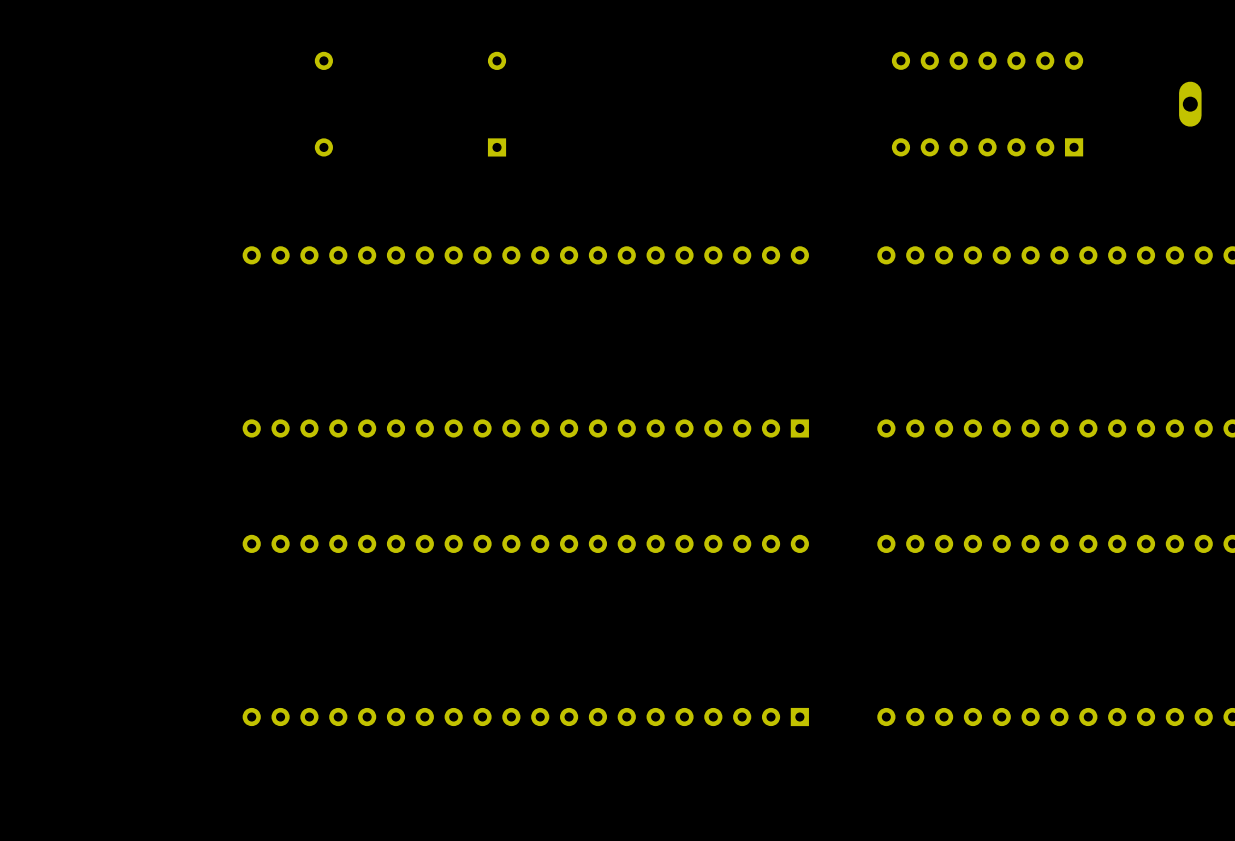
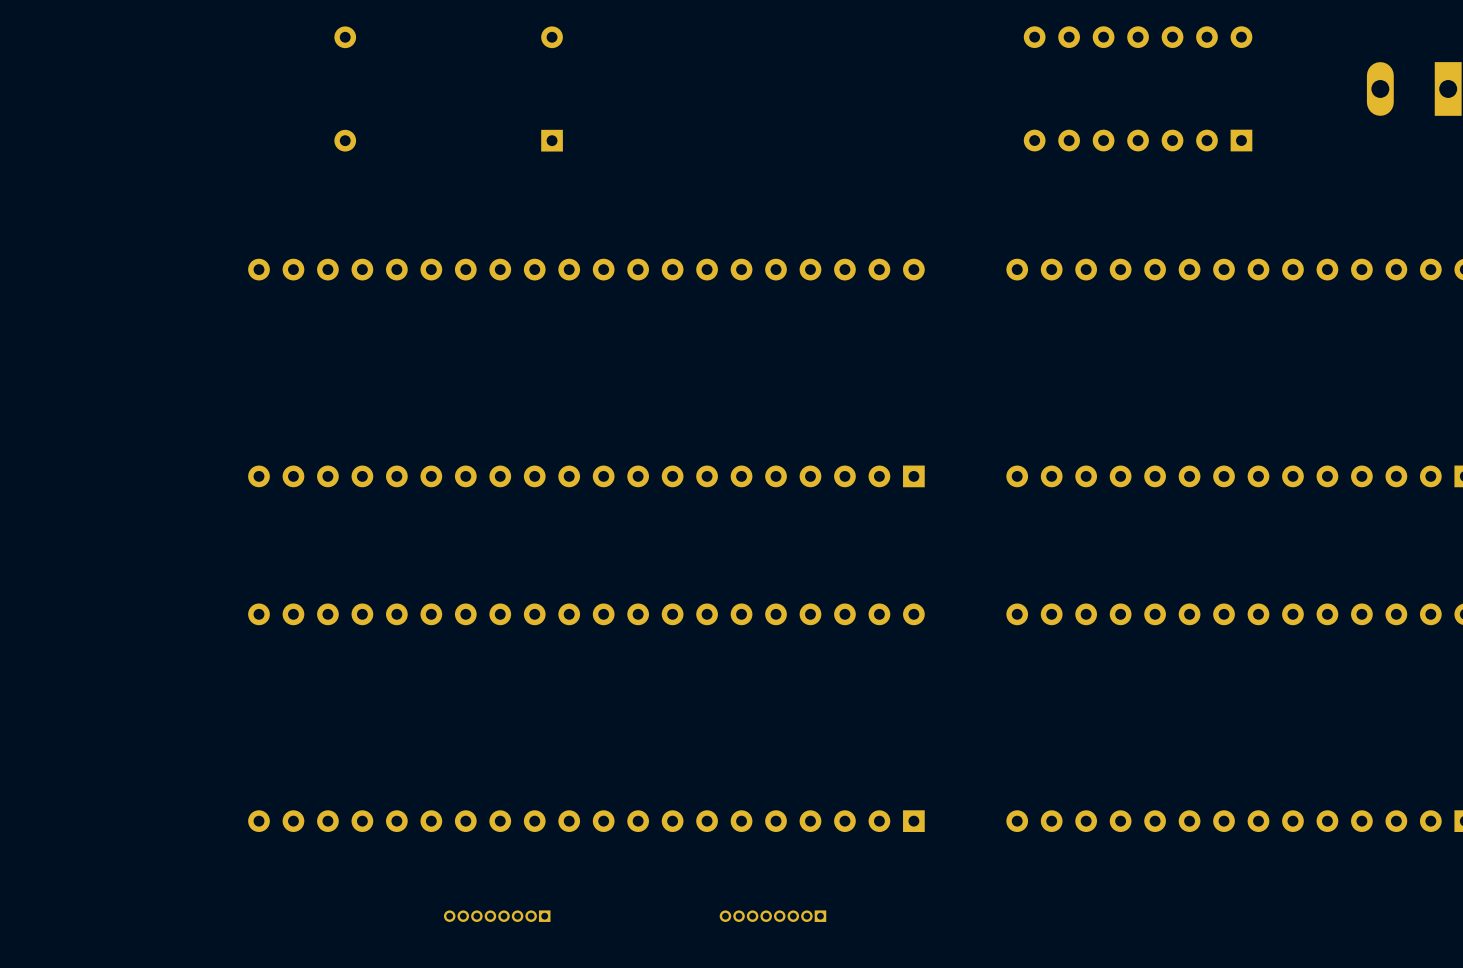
part: none -> (497, 916)
part: none -> (772, 916)

